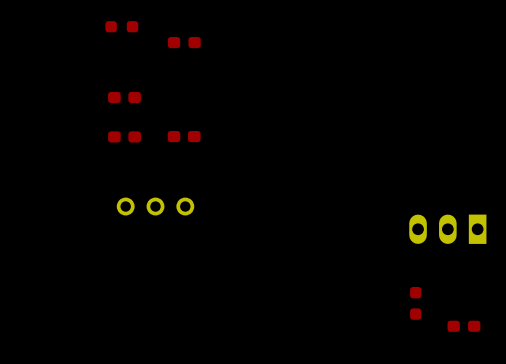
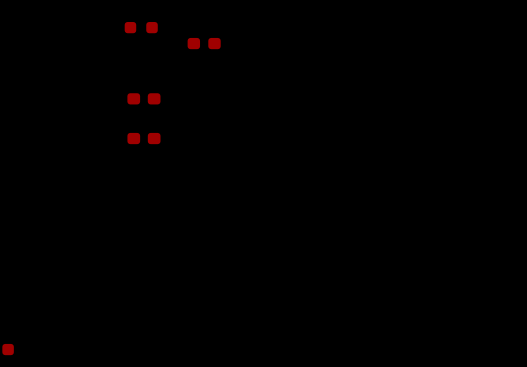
part: (184, 136) -> none
part: (155, 206) -> none
part: (447, 229) -> none
part: (415, 303) -> none
part: (463, 326) -> none

